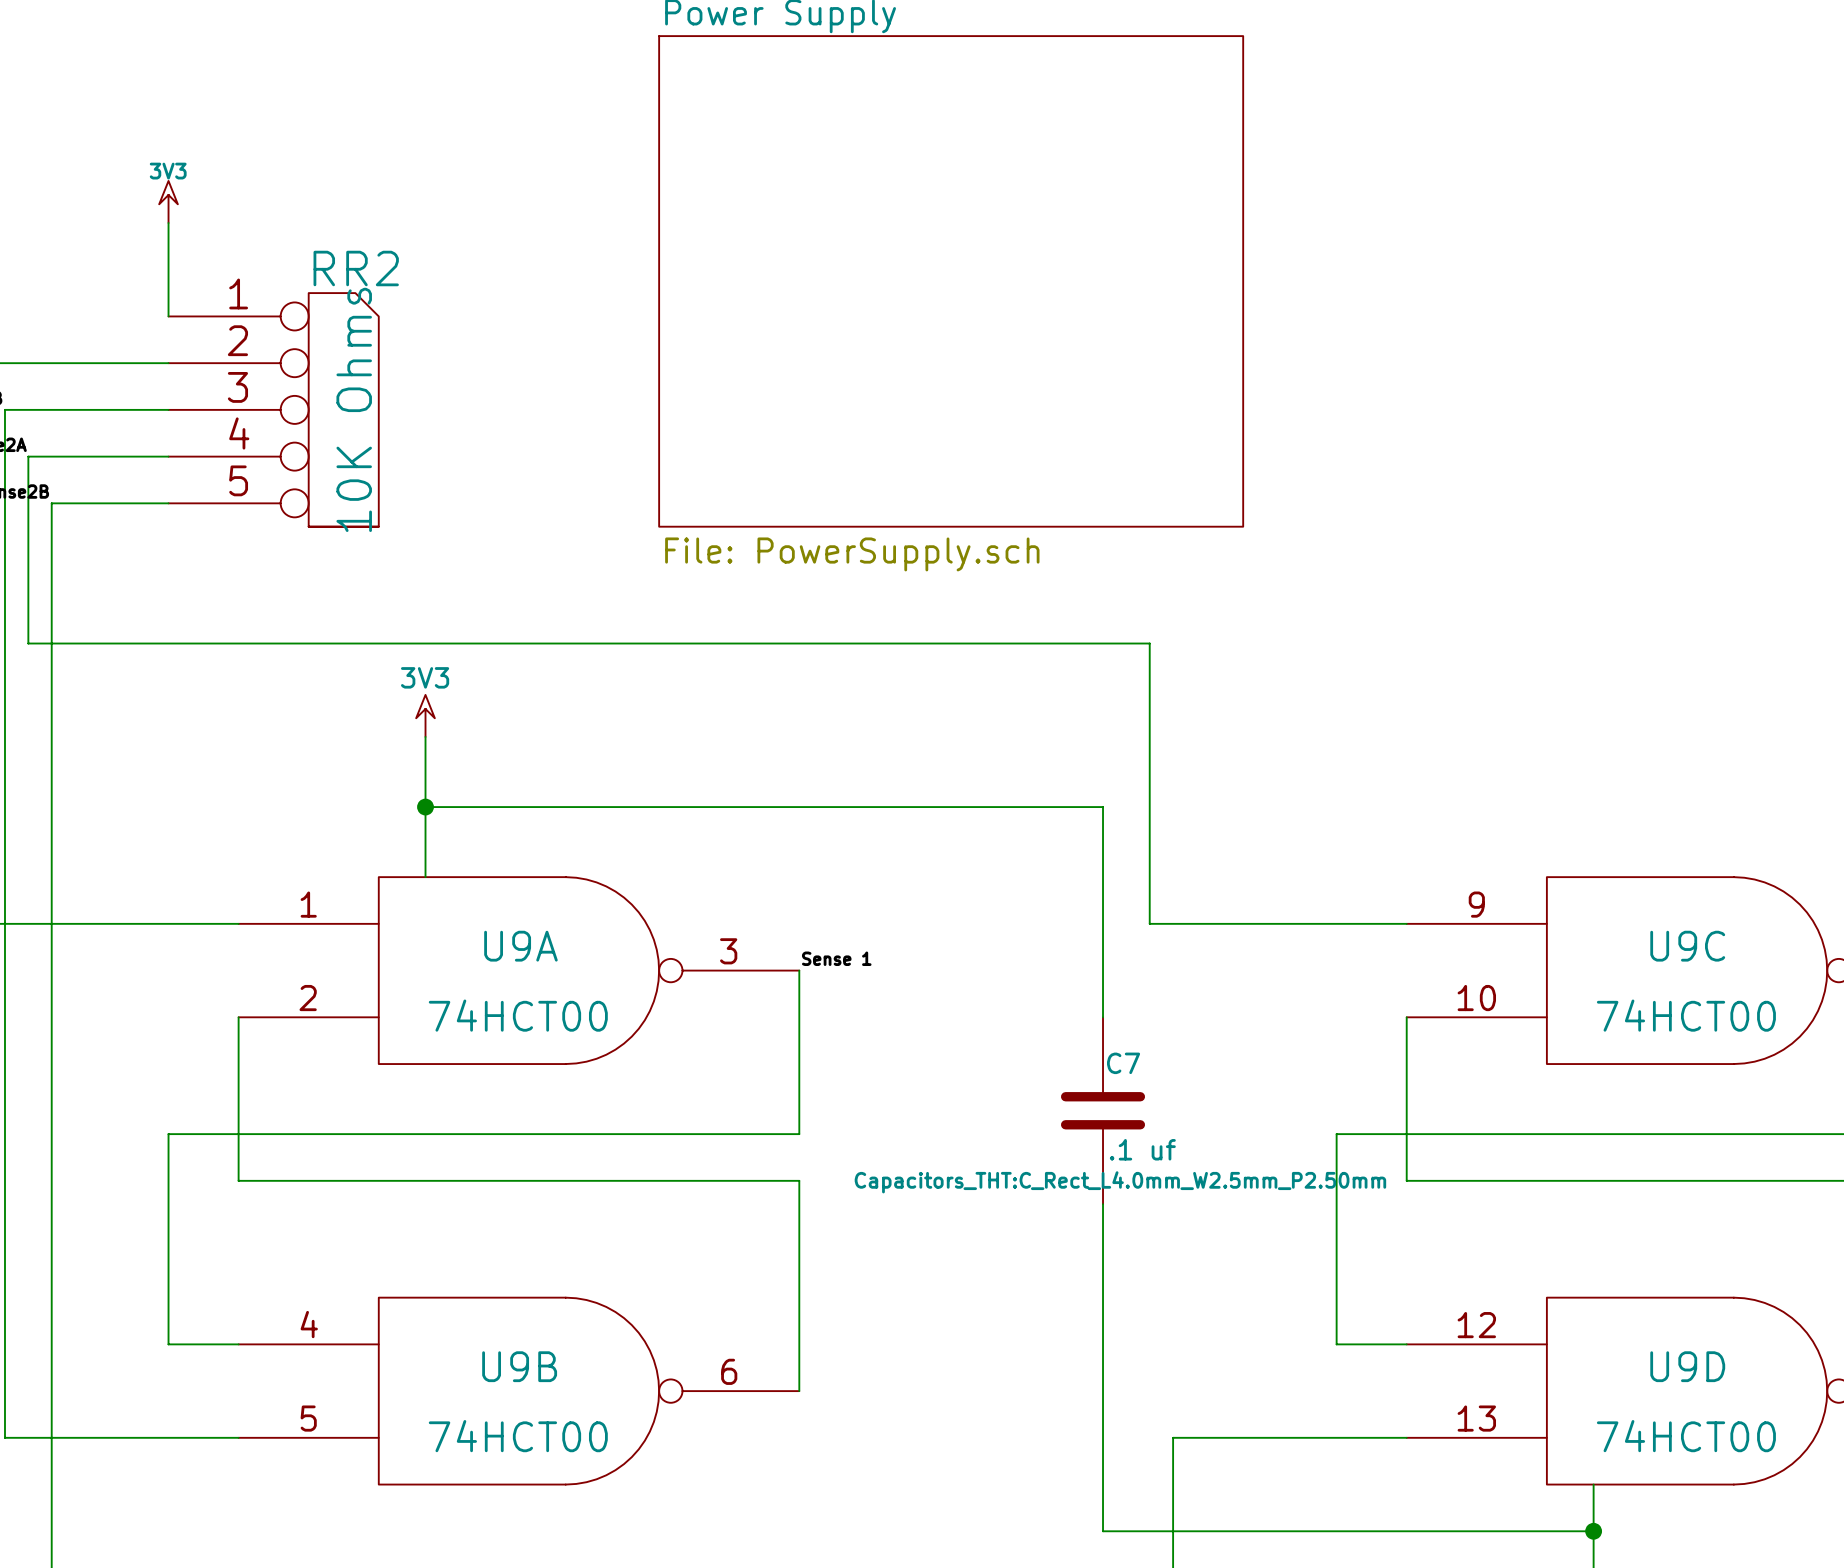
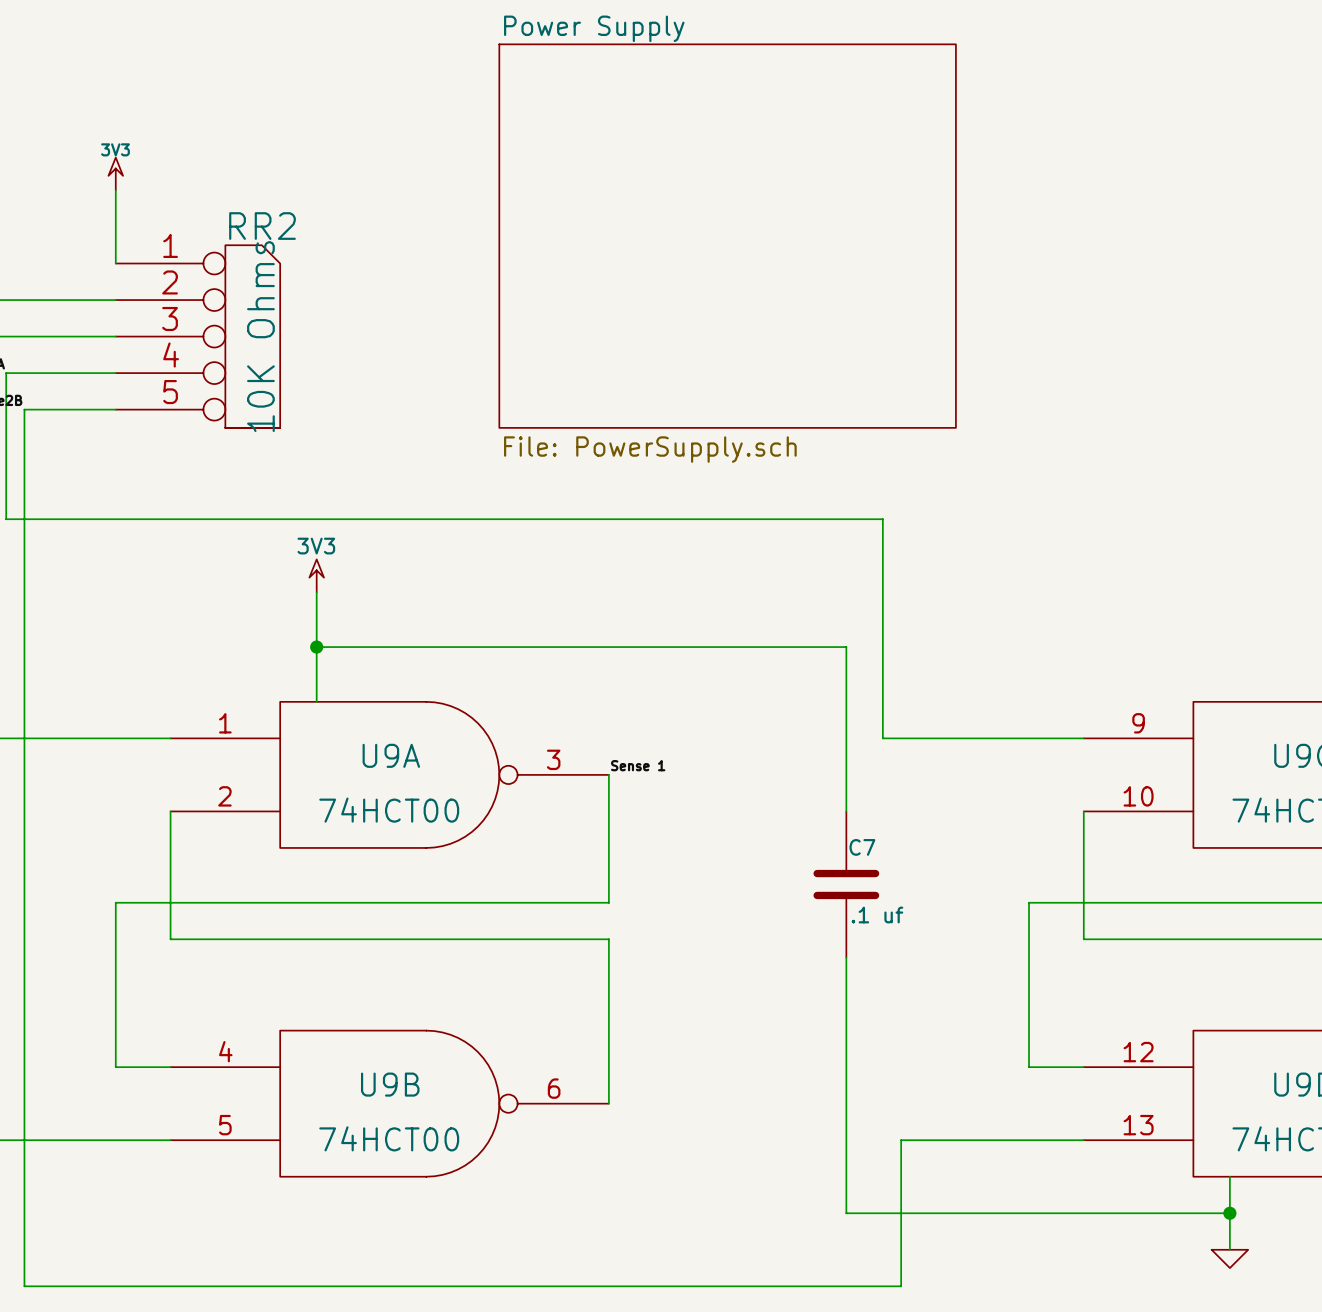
C7 text: Capacitors_THT:C_Rect_L4.0mm_W2.5mm_P2.50mm (1120, 1182) -> none

